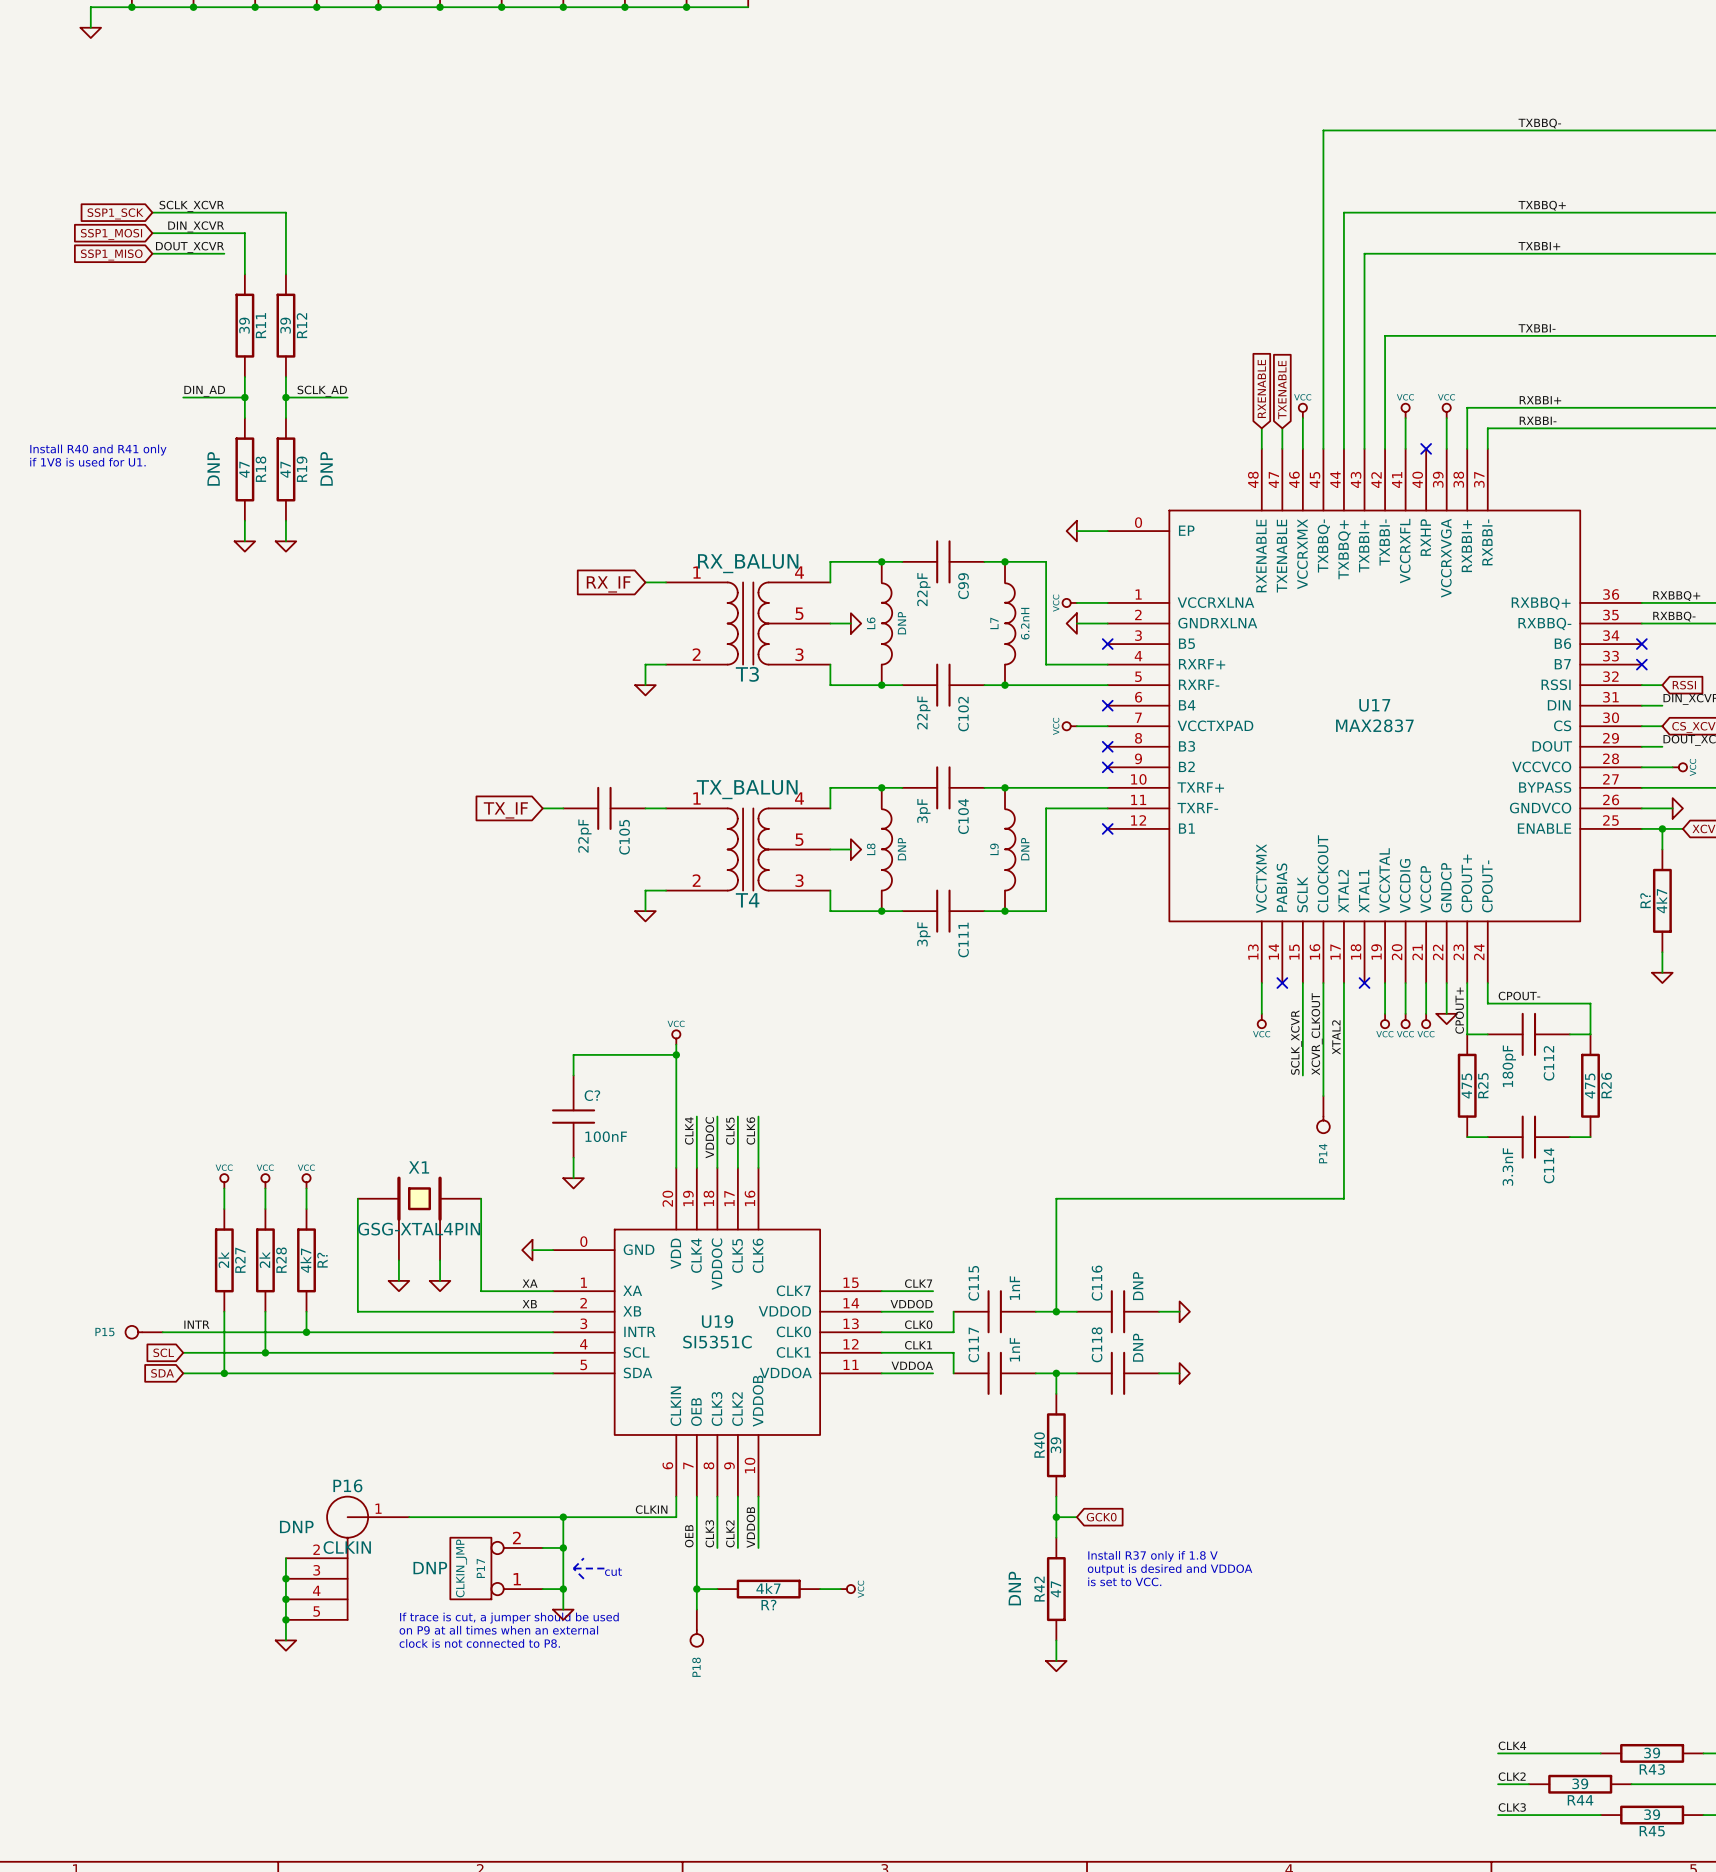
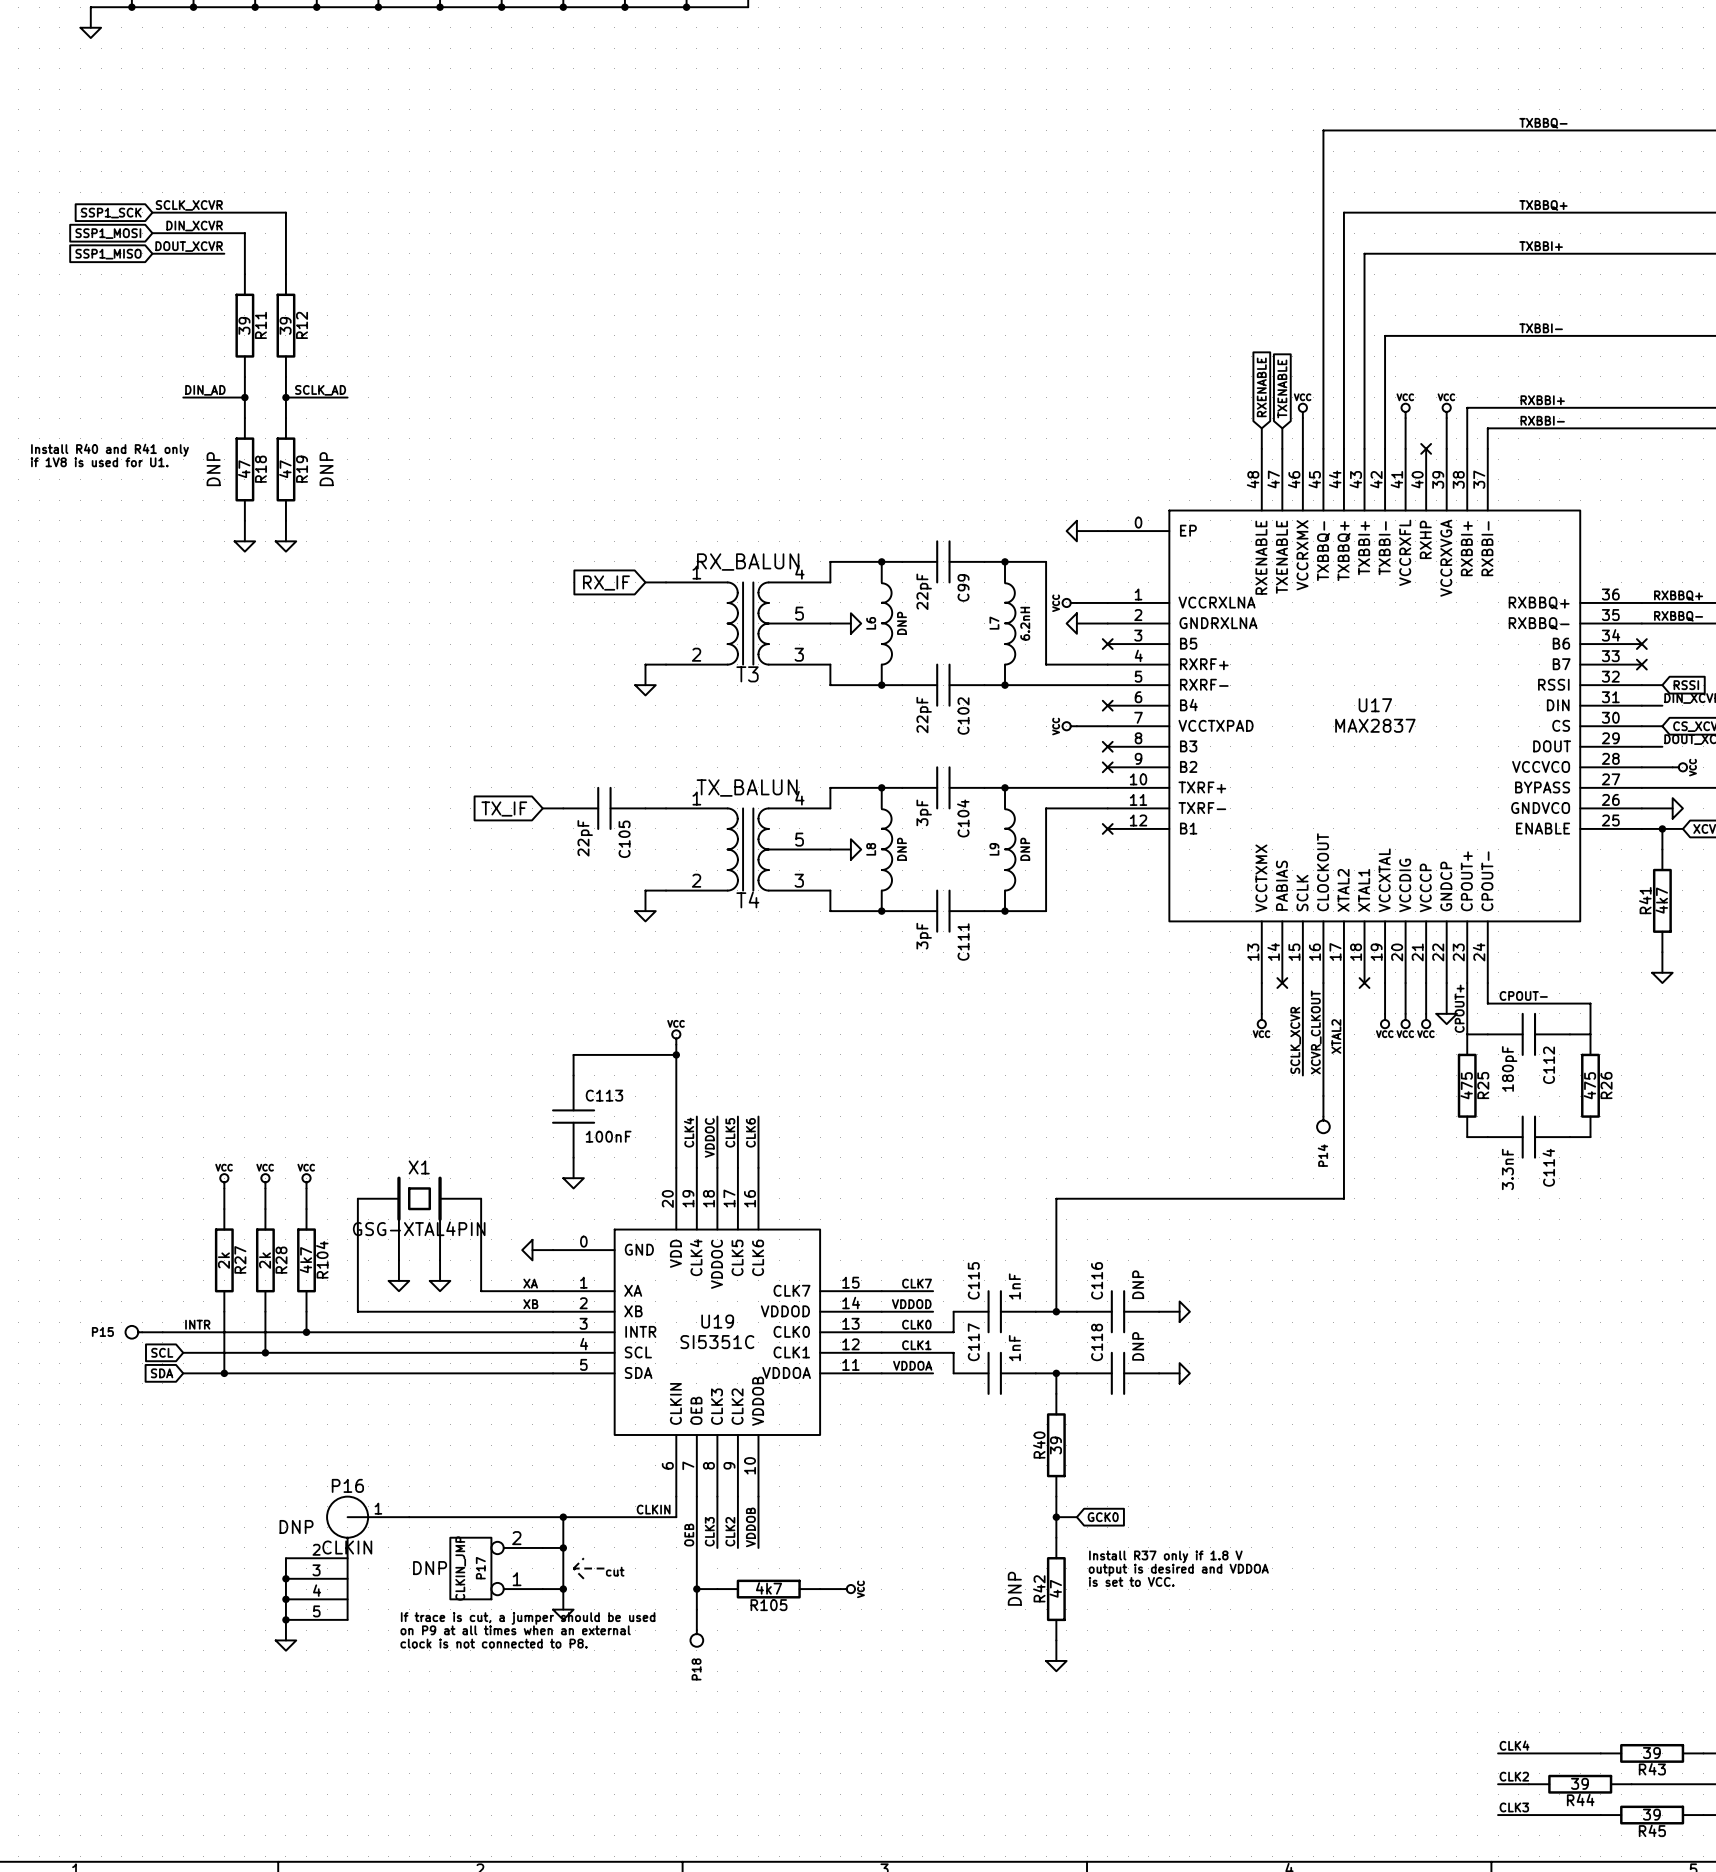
R? name: R? (1645, 900) -> R41 (1645, 900)
C? name: C? (592, 1095) -> C113 (604, 1095)
R? name: R? (322, 1260) -> R104 (322, 1259)
R? name: R? (768, 1605) -> R105 (768, 1605)

